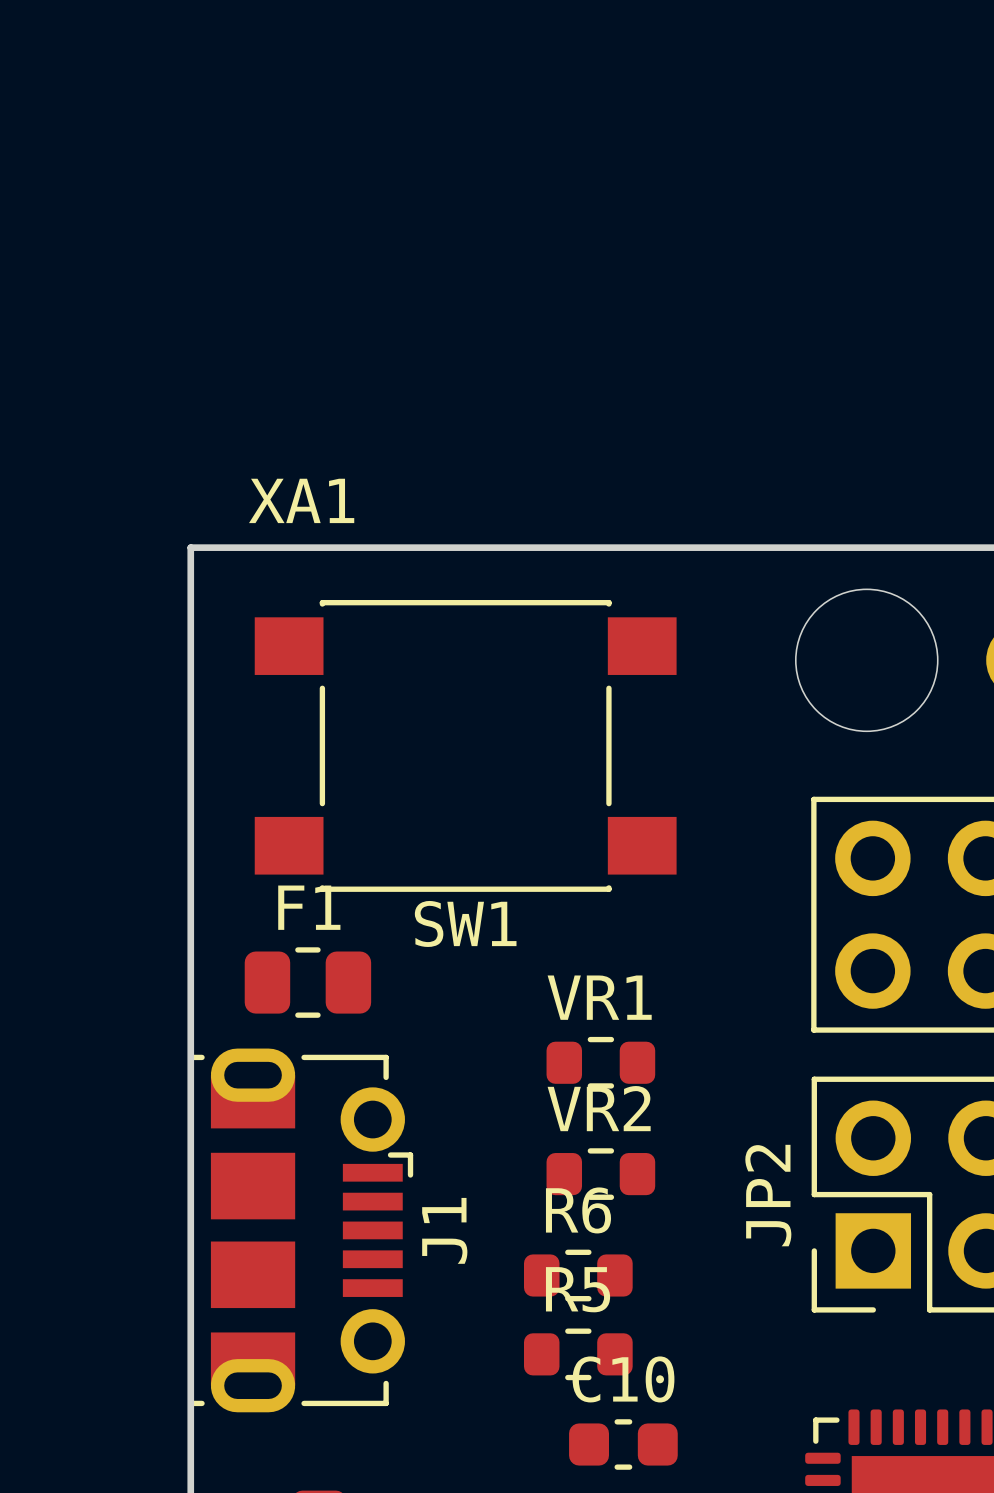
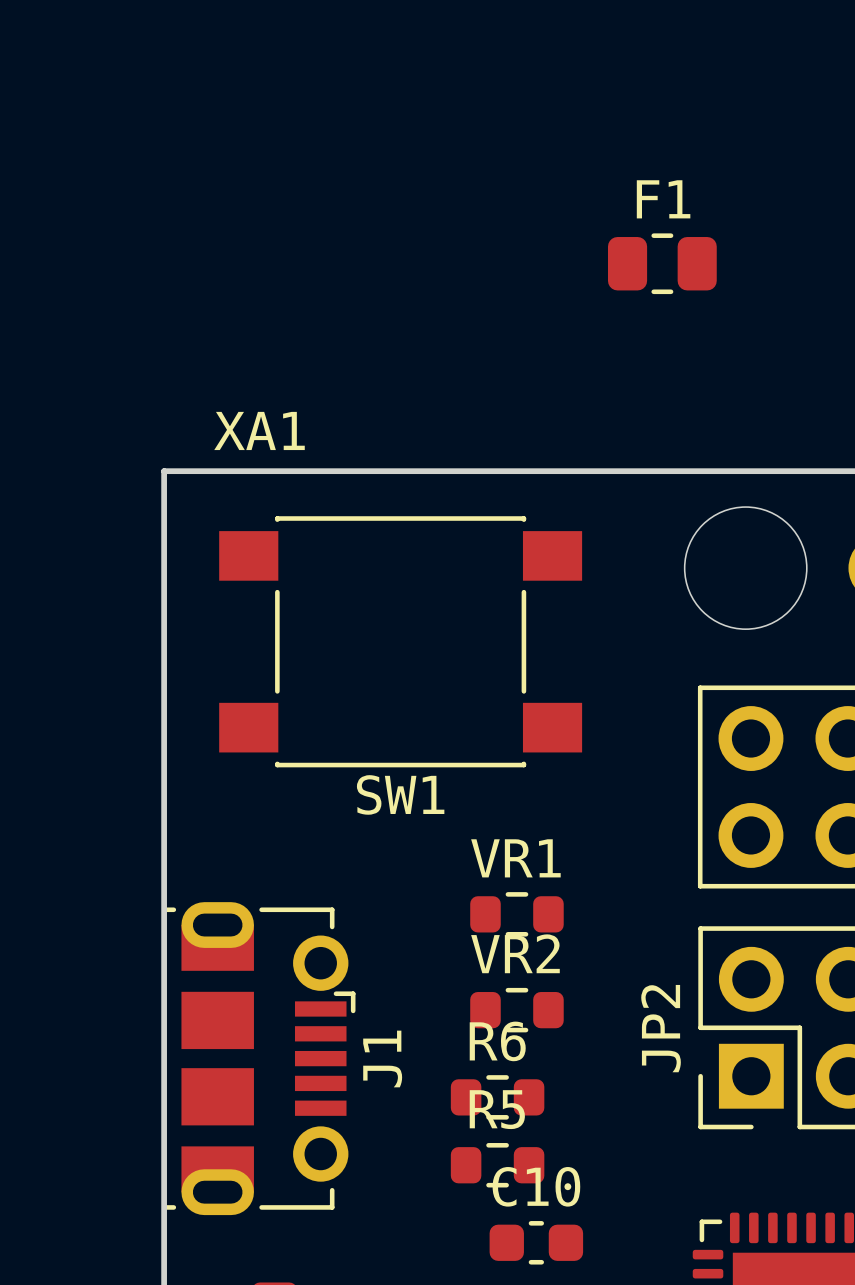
F1 position: (307, 982) -> (662, 263)

